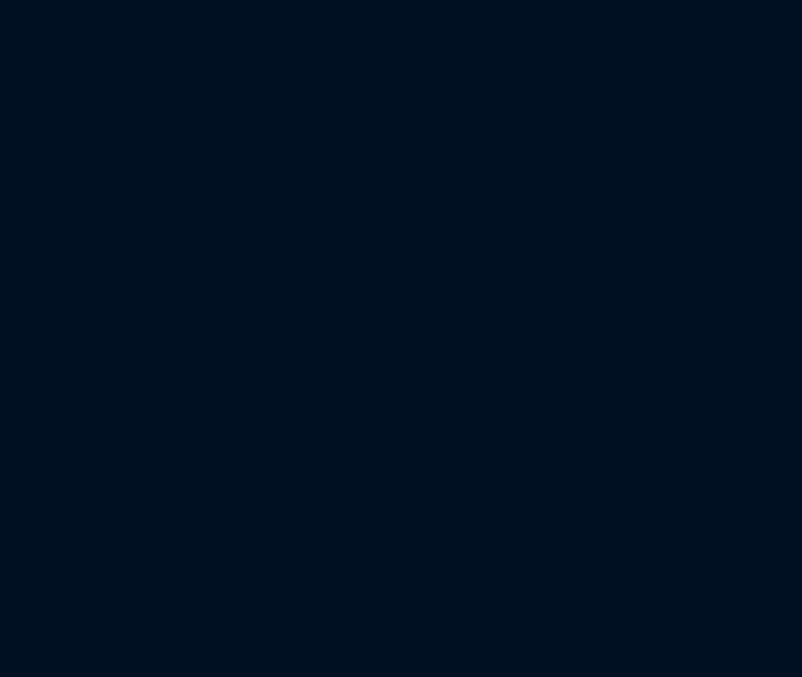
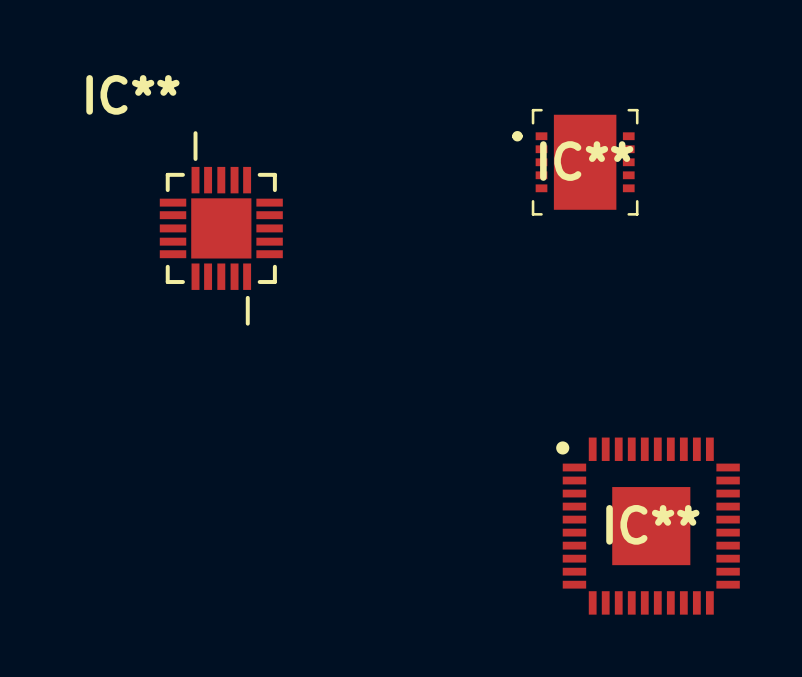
IC**: none -> (575, 162)
IC**: none -> (221, 228)
IC**: none -> (648, 526)

